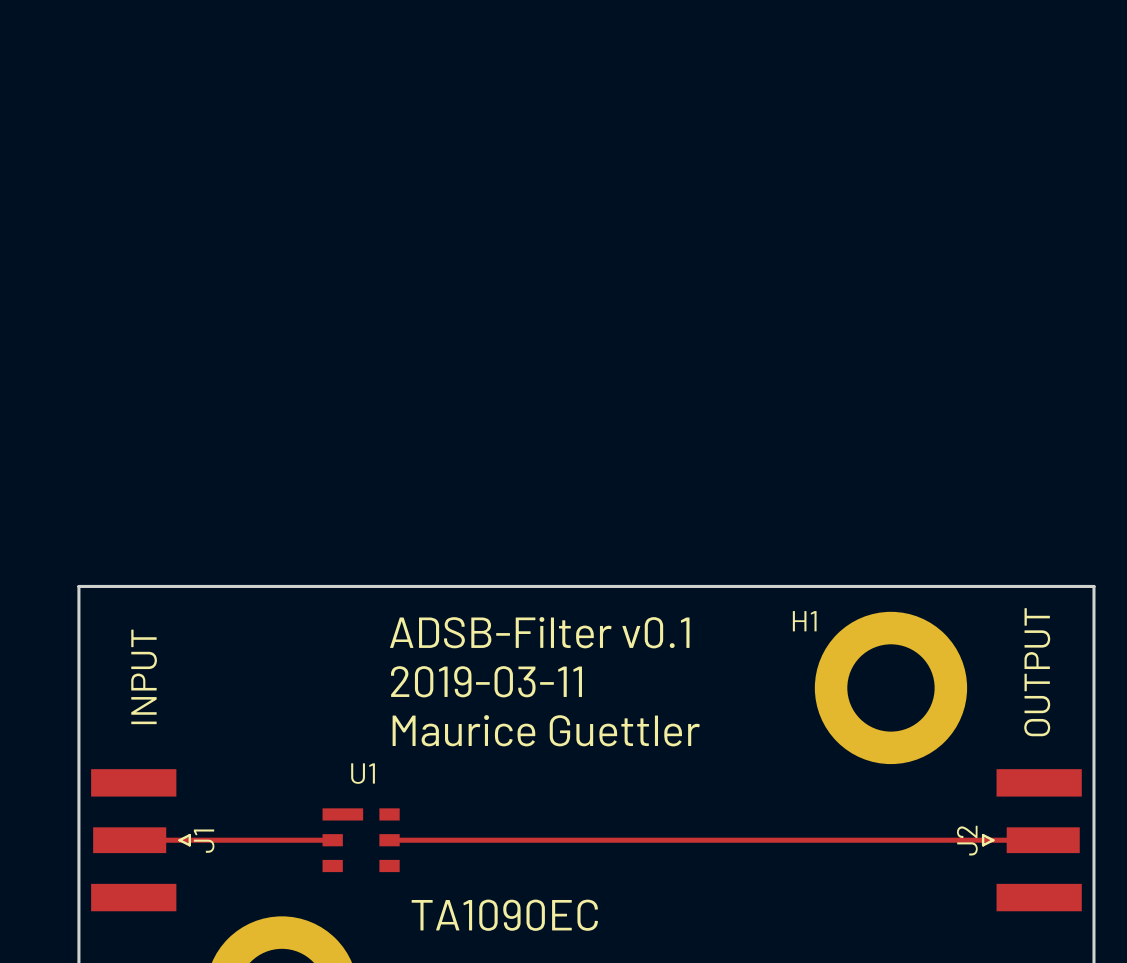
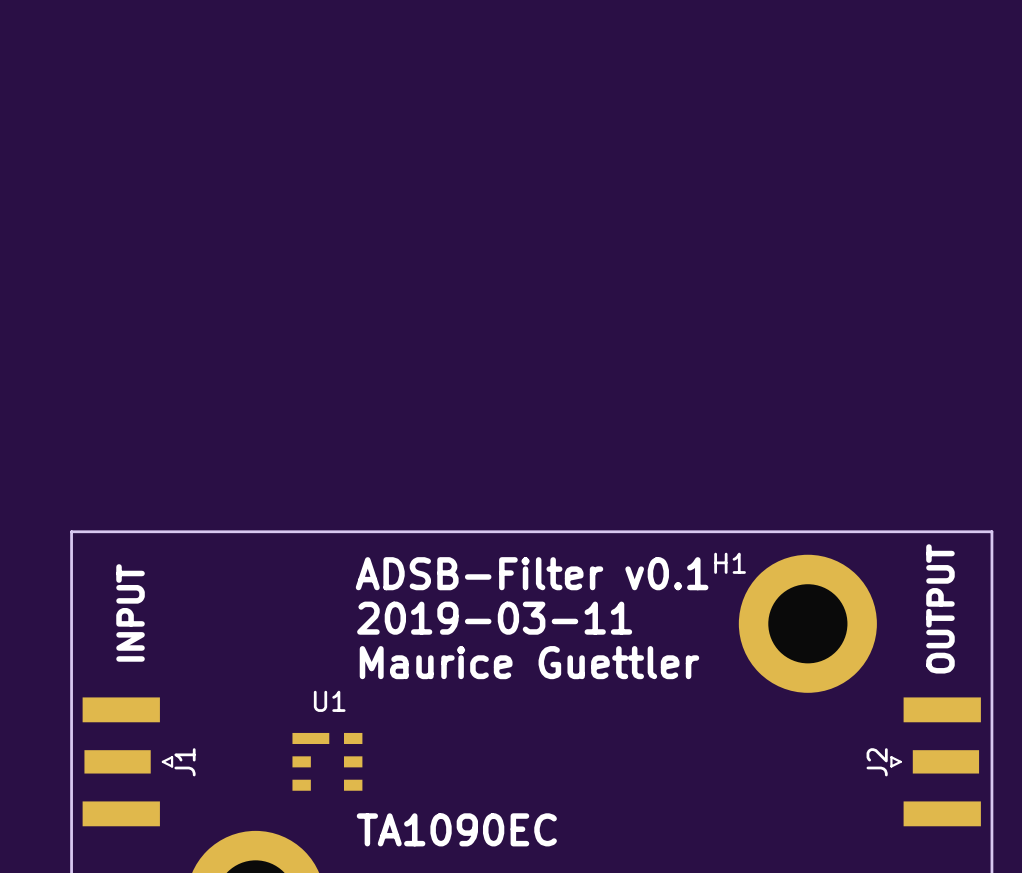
track: (129, 840) (332, 840) -> none
track: (389, 840) (1043, 840) -> none

